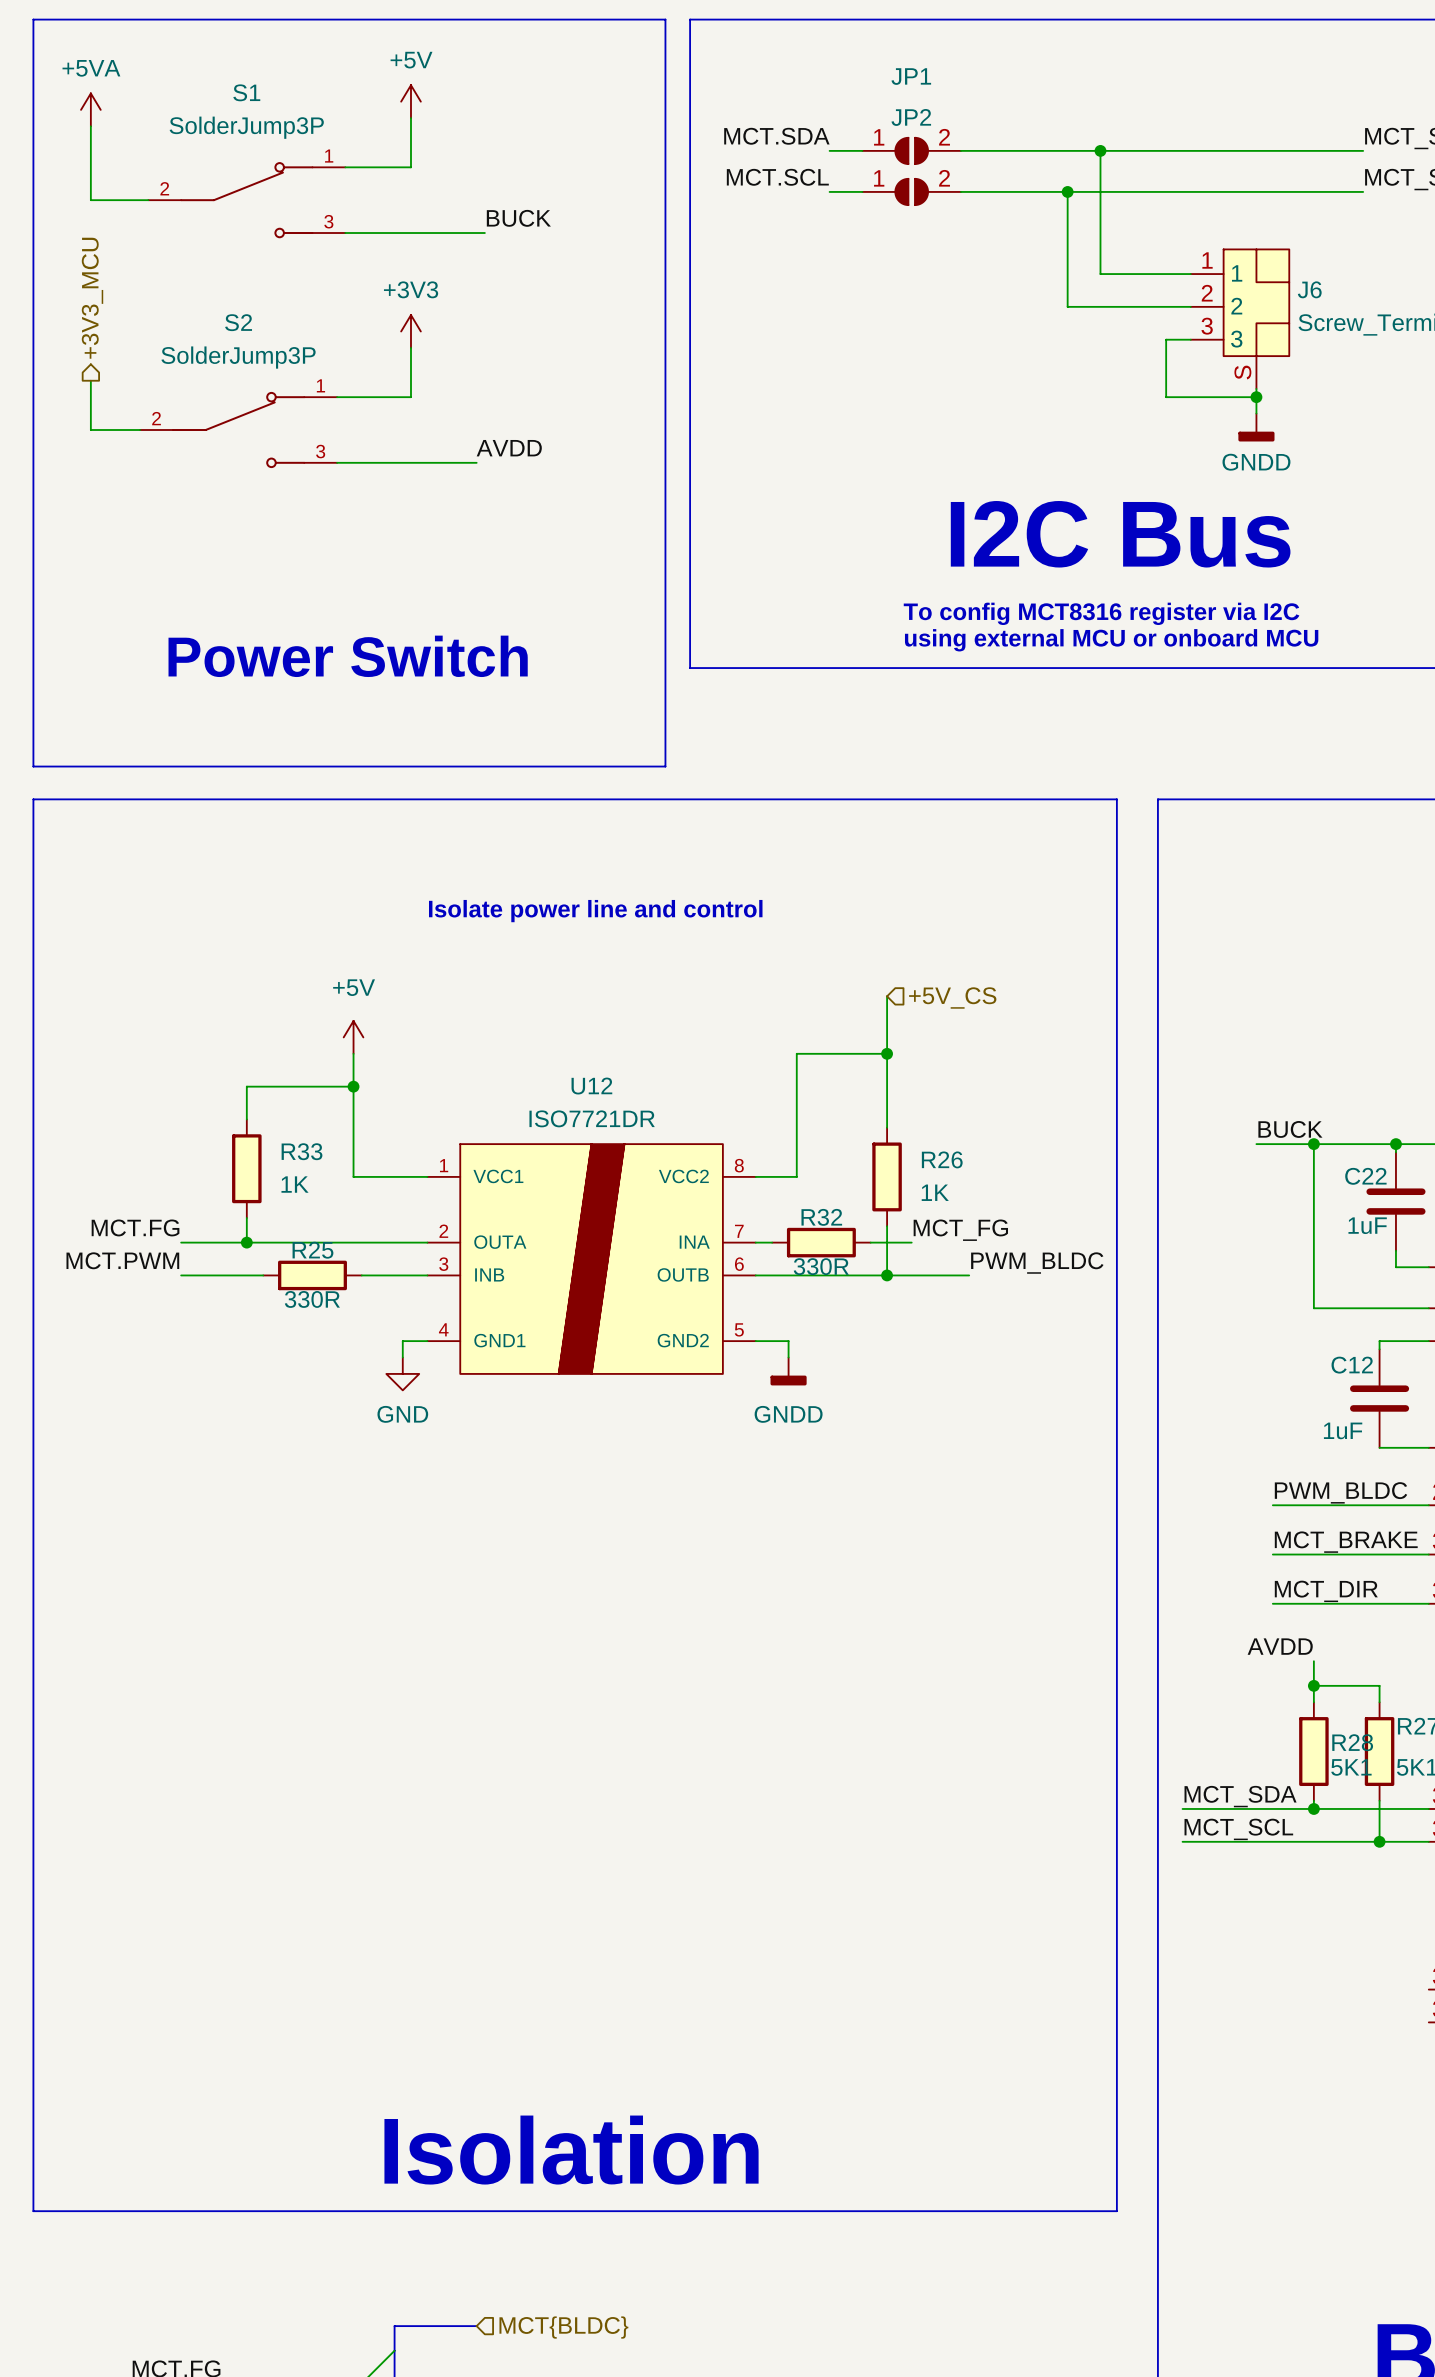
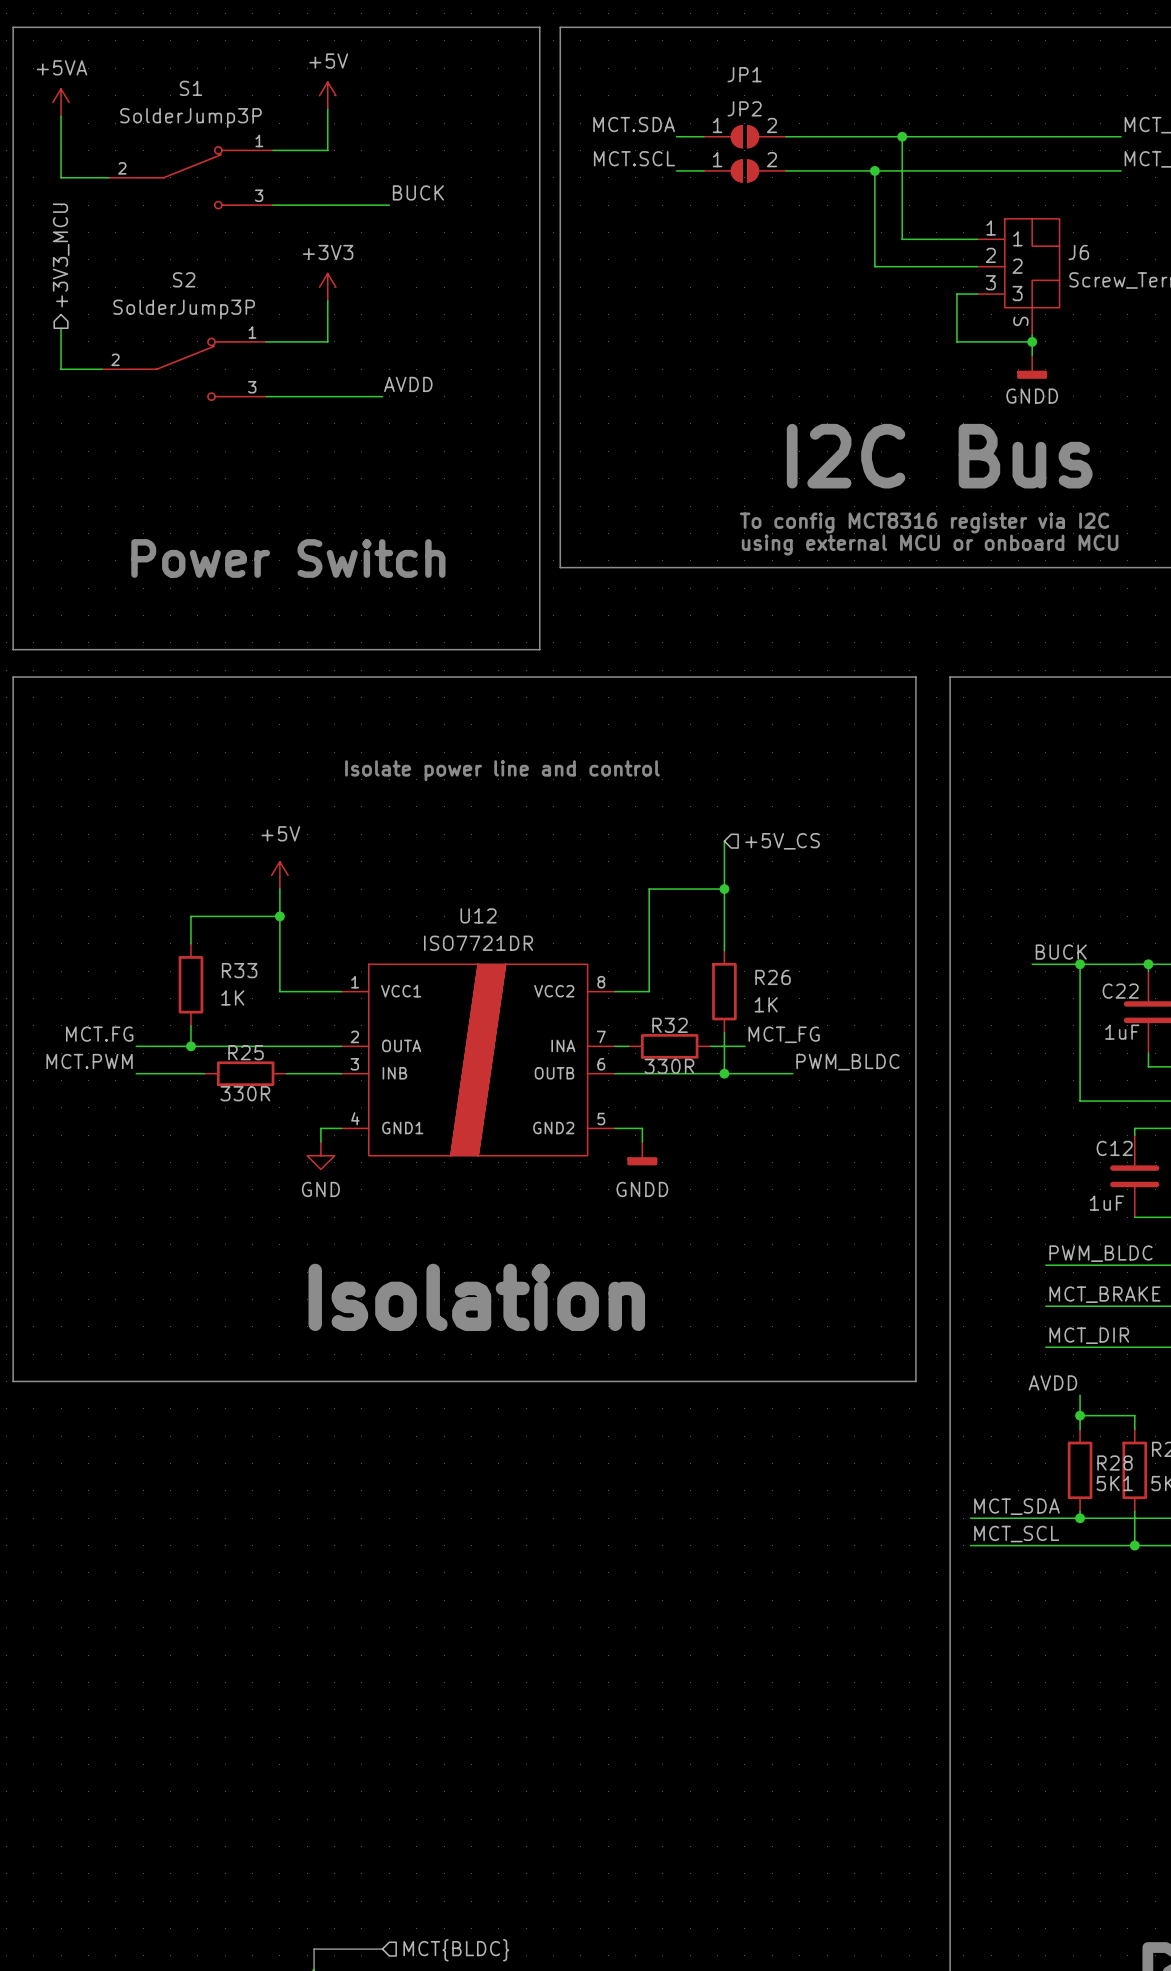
text: none -> Isolation (476, 1297)
line: (33, 1644) (33, 2211) (1116, 2211) (1116, 1644) -> (13, 1381) (915, 1381)
text: Isolation (571, 2150) -> none

